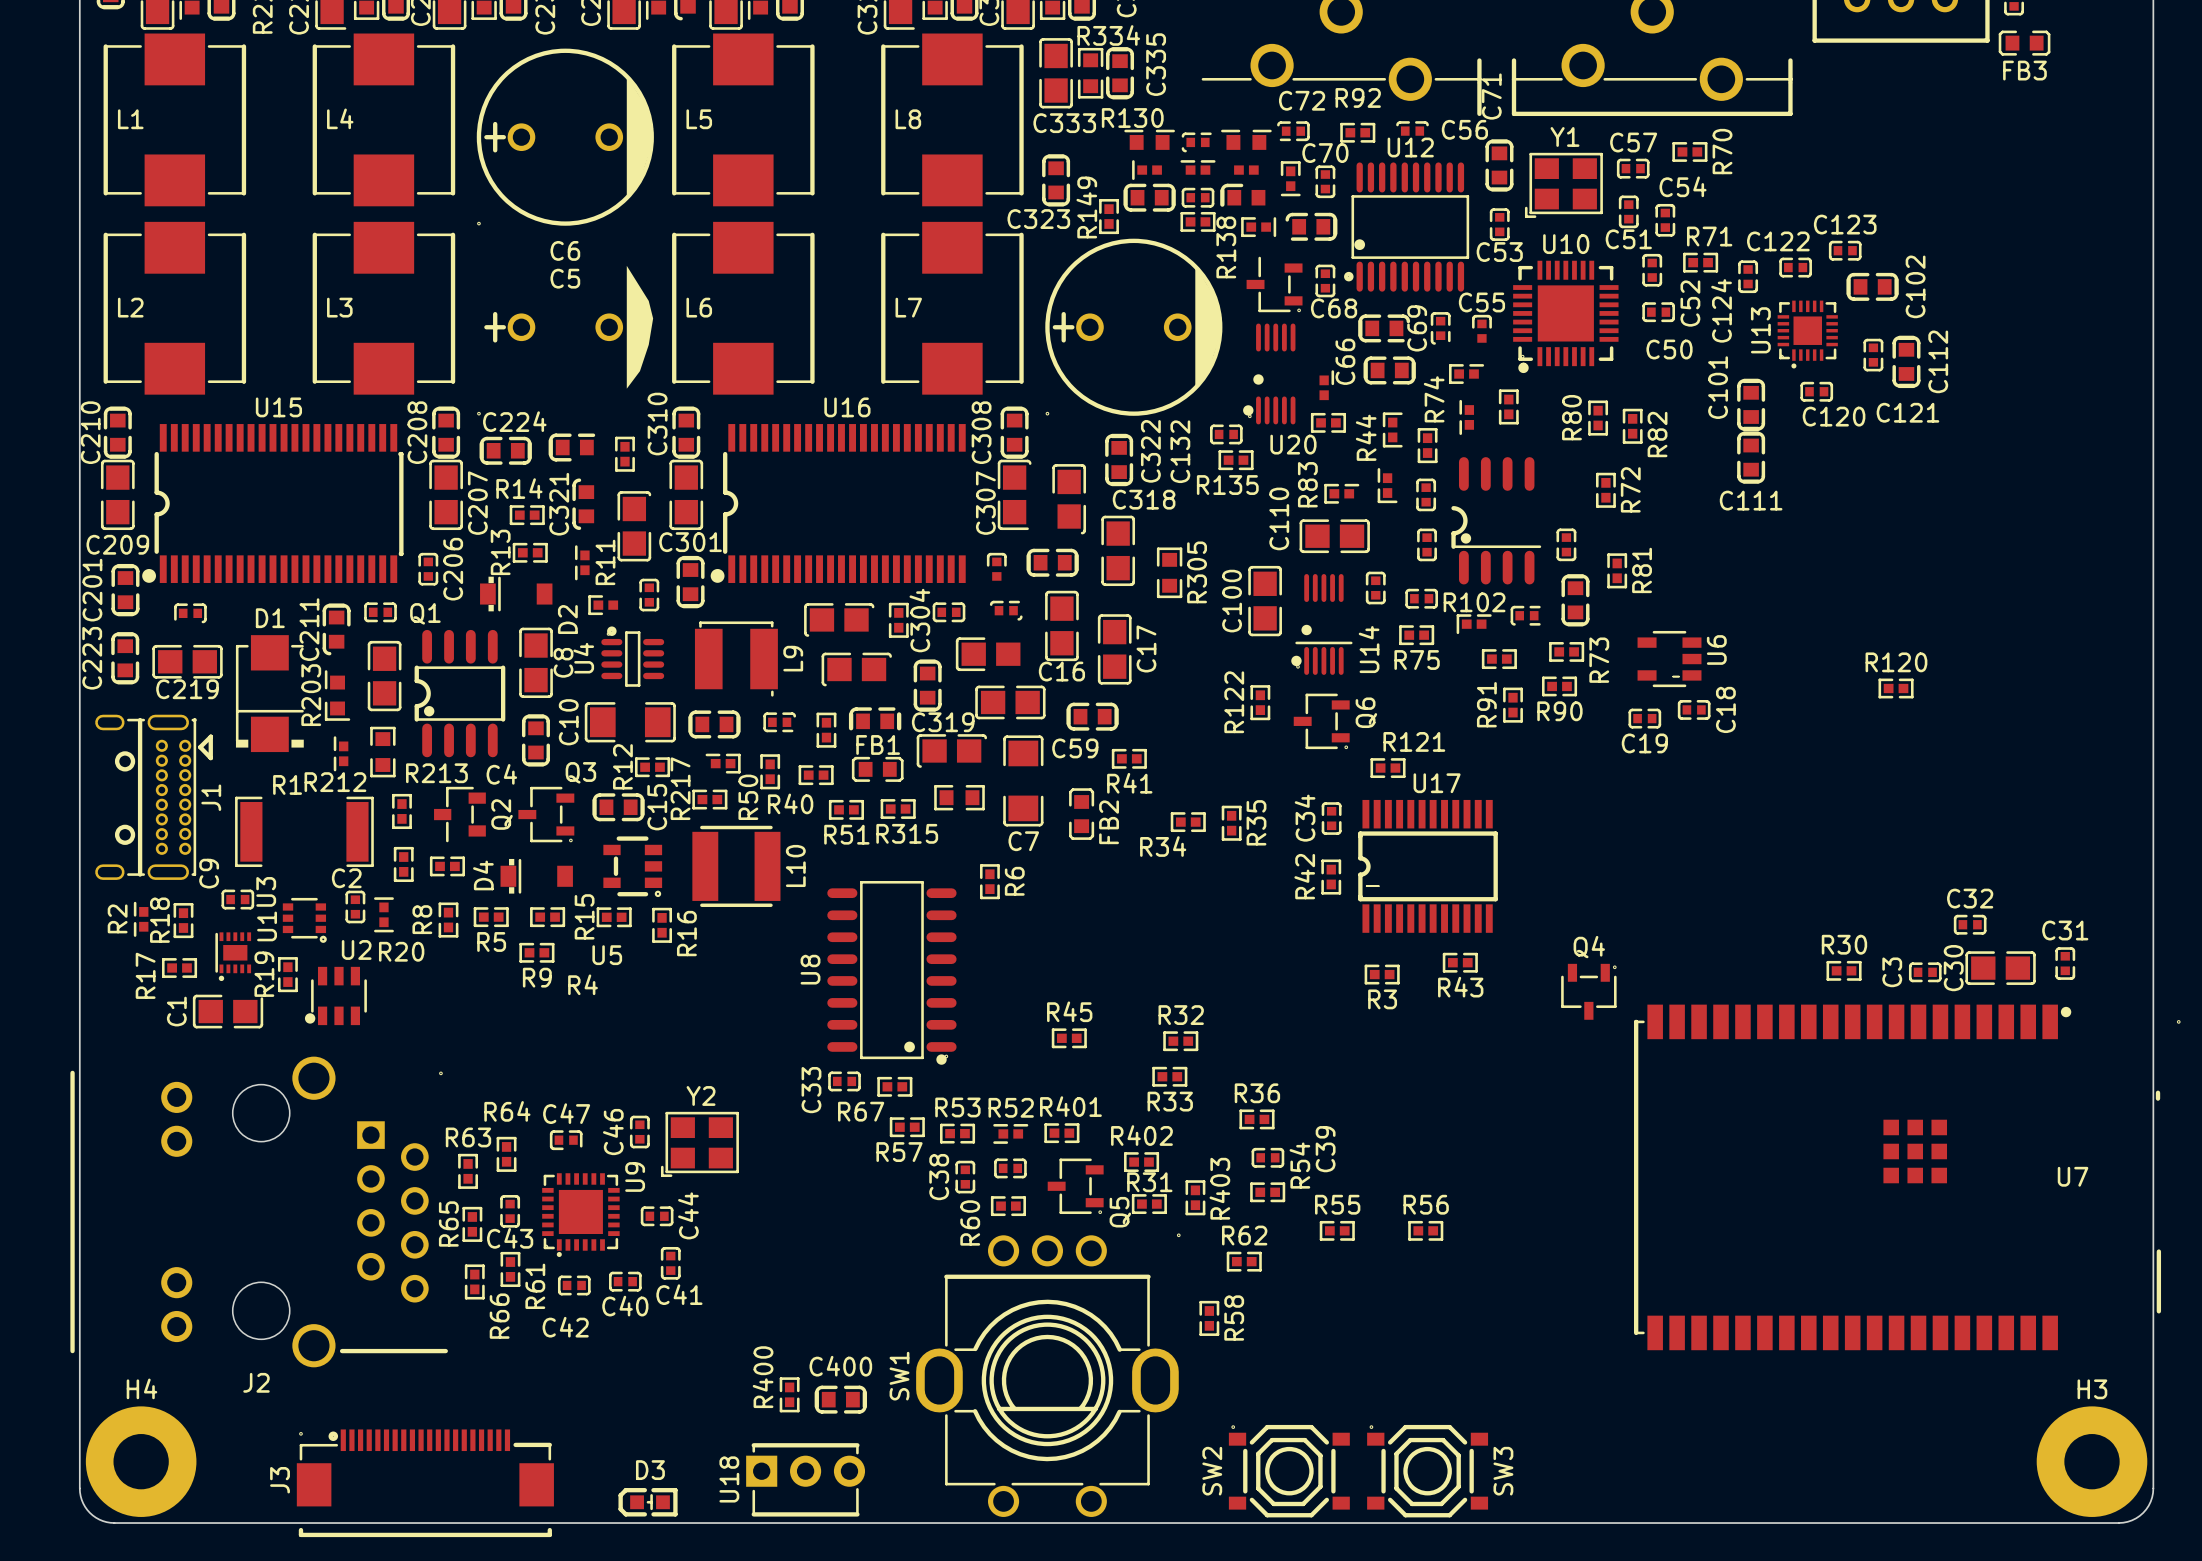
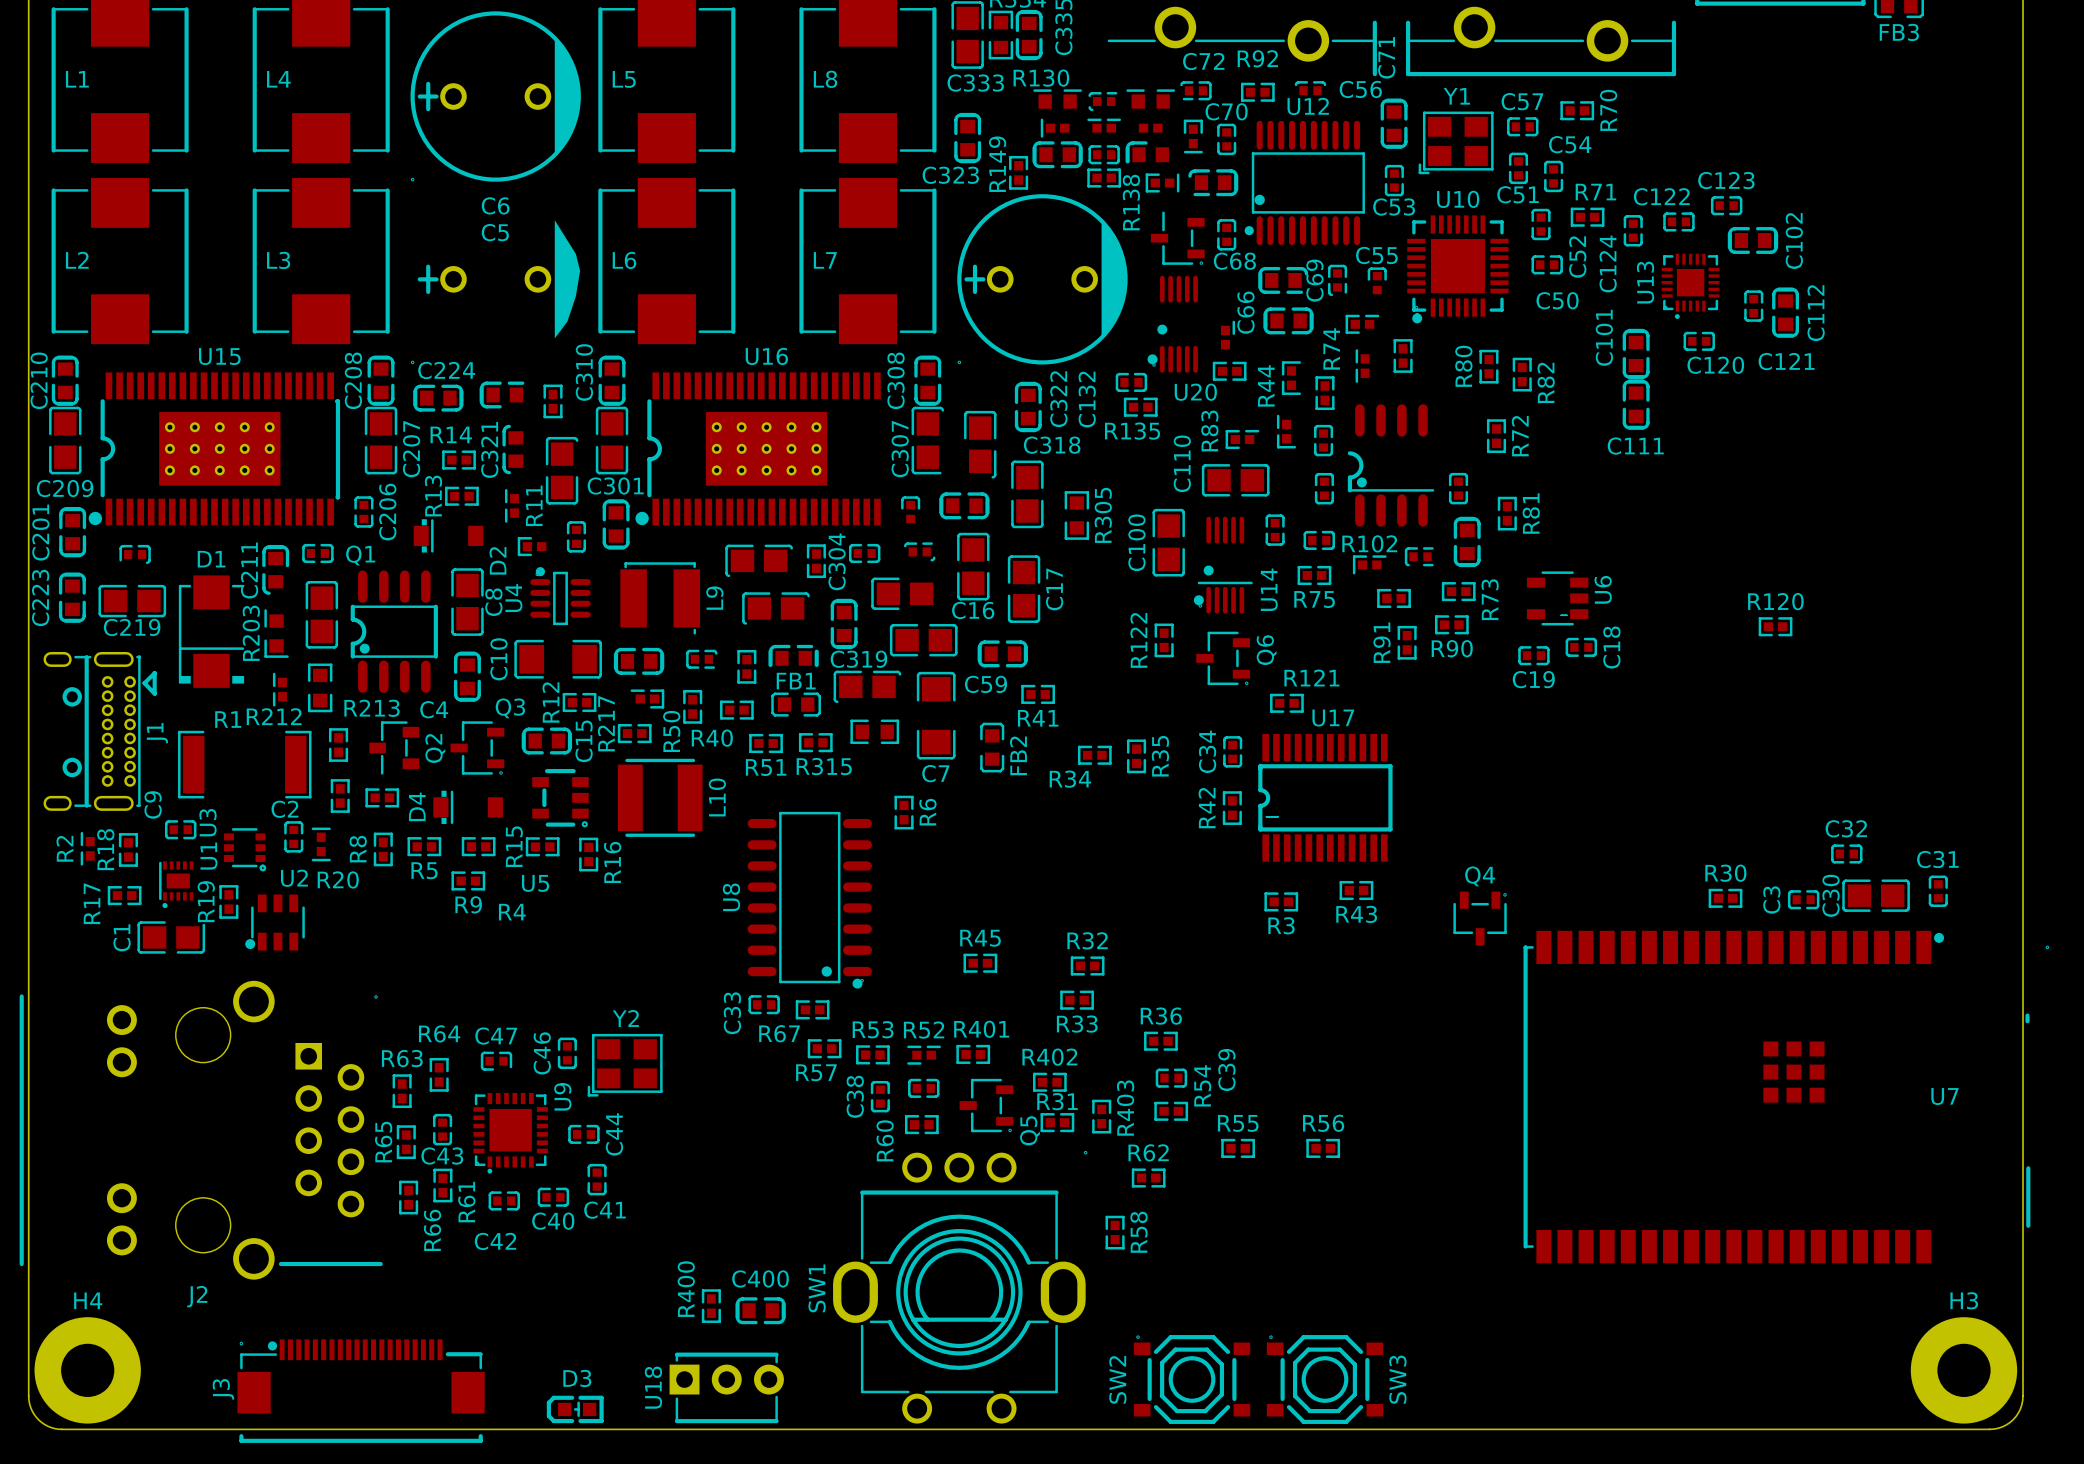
U15 footprint: [142, 424, 404, 584] -> [88, 372, 341, 526]
U16 footprint: [710, 424, 966, 584] -> [635, 372, 881, 526]

